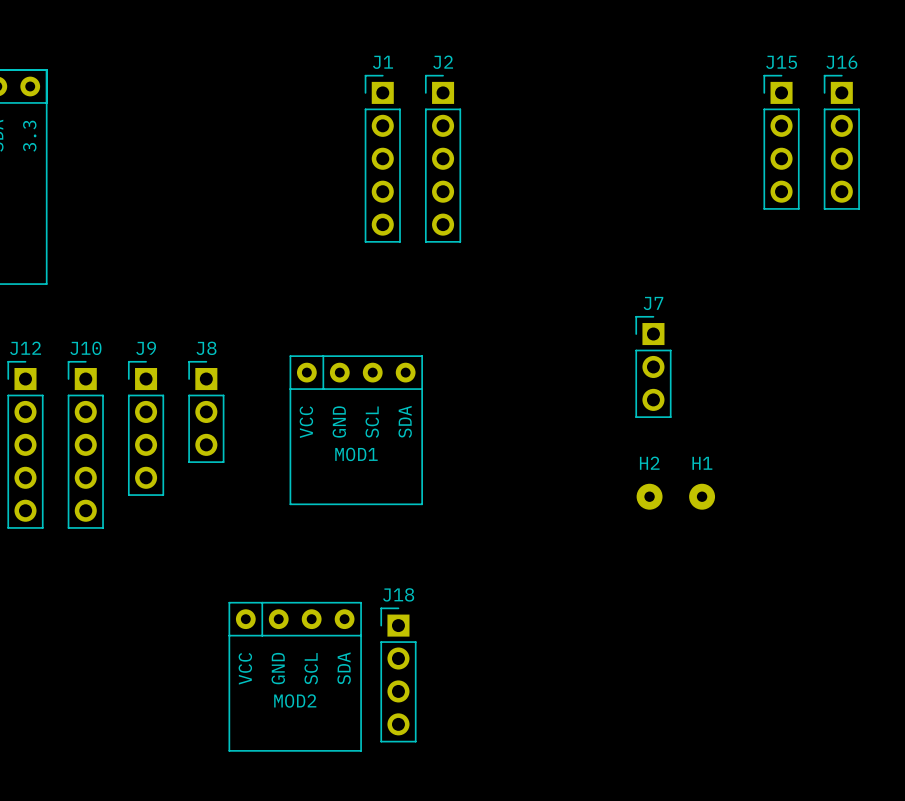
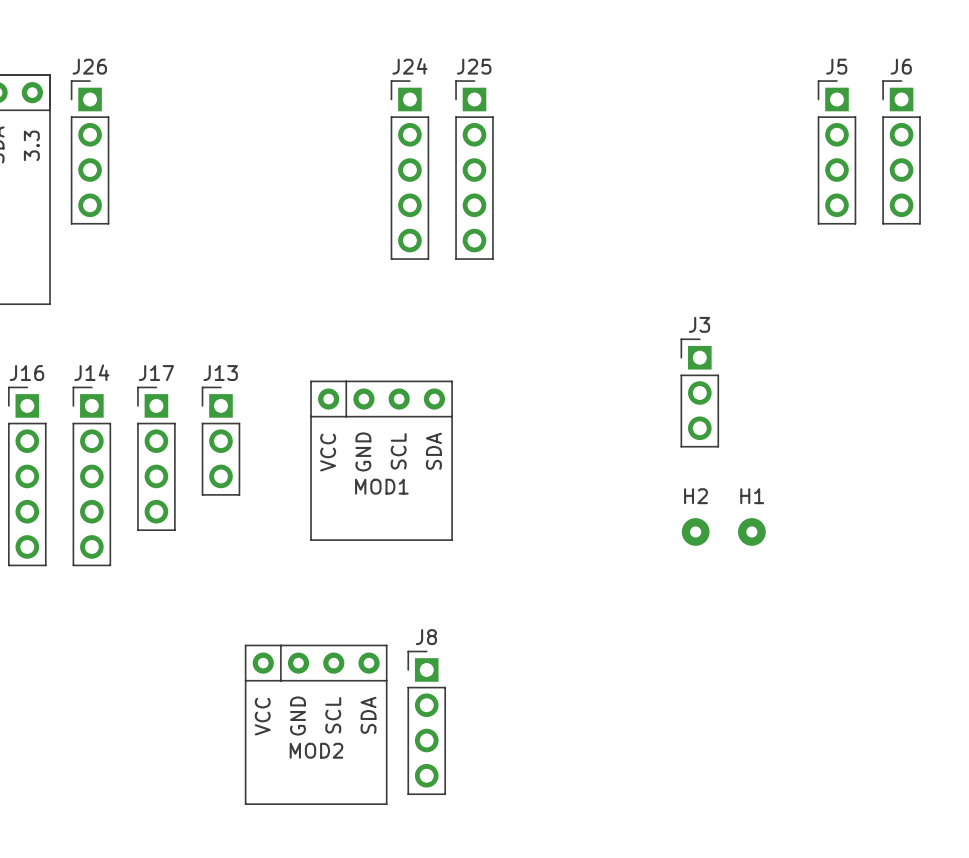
J1 name: J1 (383, 62) -> J24 (409, 66)
J2 name: J2 (443, 62) -> J25 (474, 66)
J15 name: J15 (781, 62) -> J5 (836, 66)
J16 name: J16 (841, 62) -> J6 (901, 66)
J26: none -> (90, 152)
J7 name: J7 (653, 303) -> J3 (699, 324)
J12 name: J12 (25, 348) -> J16 (26, 373)
J10 name: J10 (85, 348) -> J14 (91, 372)
J9 name: J9 (146, 348) -> J17 (156, 373)
J8 name: J8 (206, 348) -> J13 (220, 373)
J18 name: J18 (398, 594) -> J8 (426, 637)

